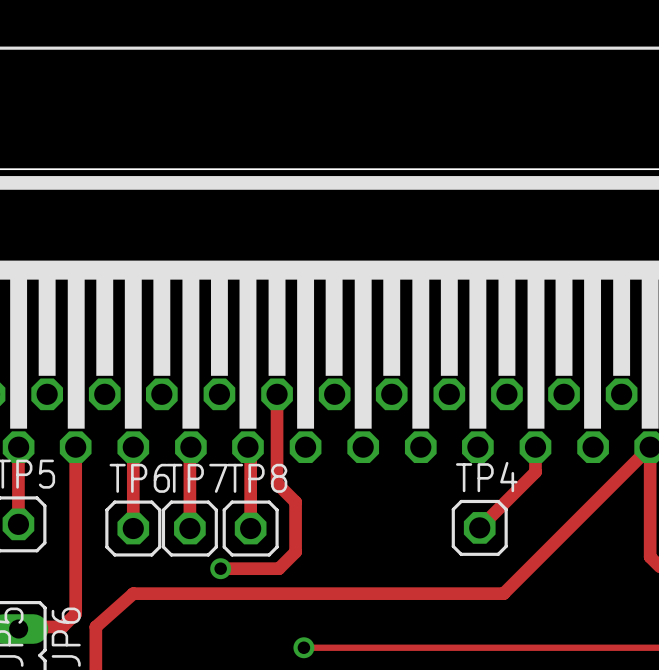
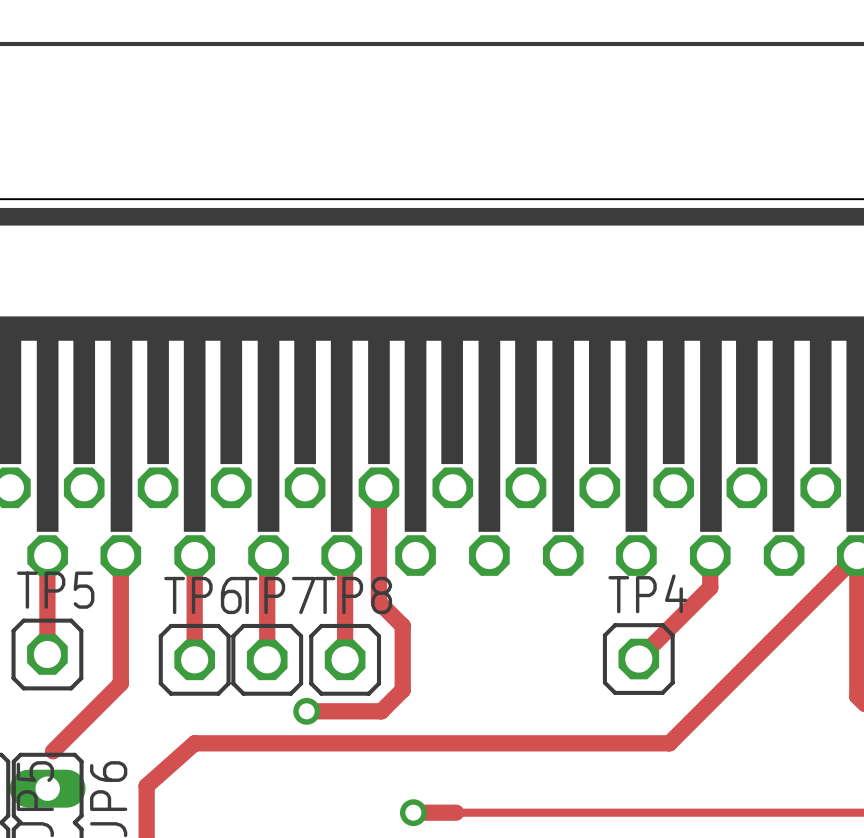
track: (75, 547) (75, 613) (62, 626) (20, 626) (18, 629) -> (120, 683) (53, 751)
track width: thin (303, 647) (337, 647) -> thick (413, 812) (456, 812)

